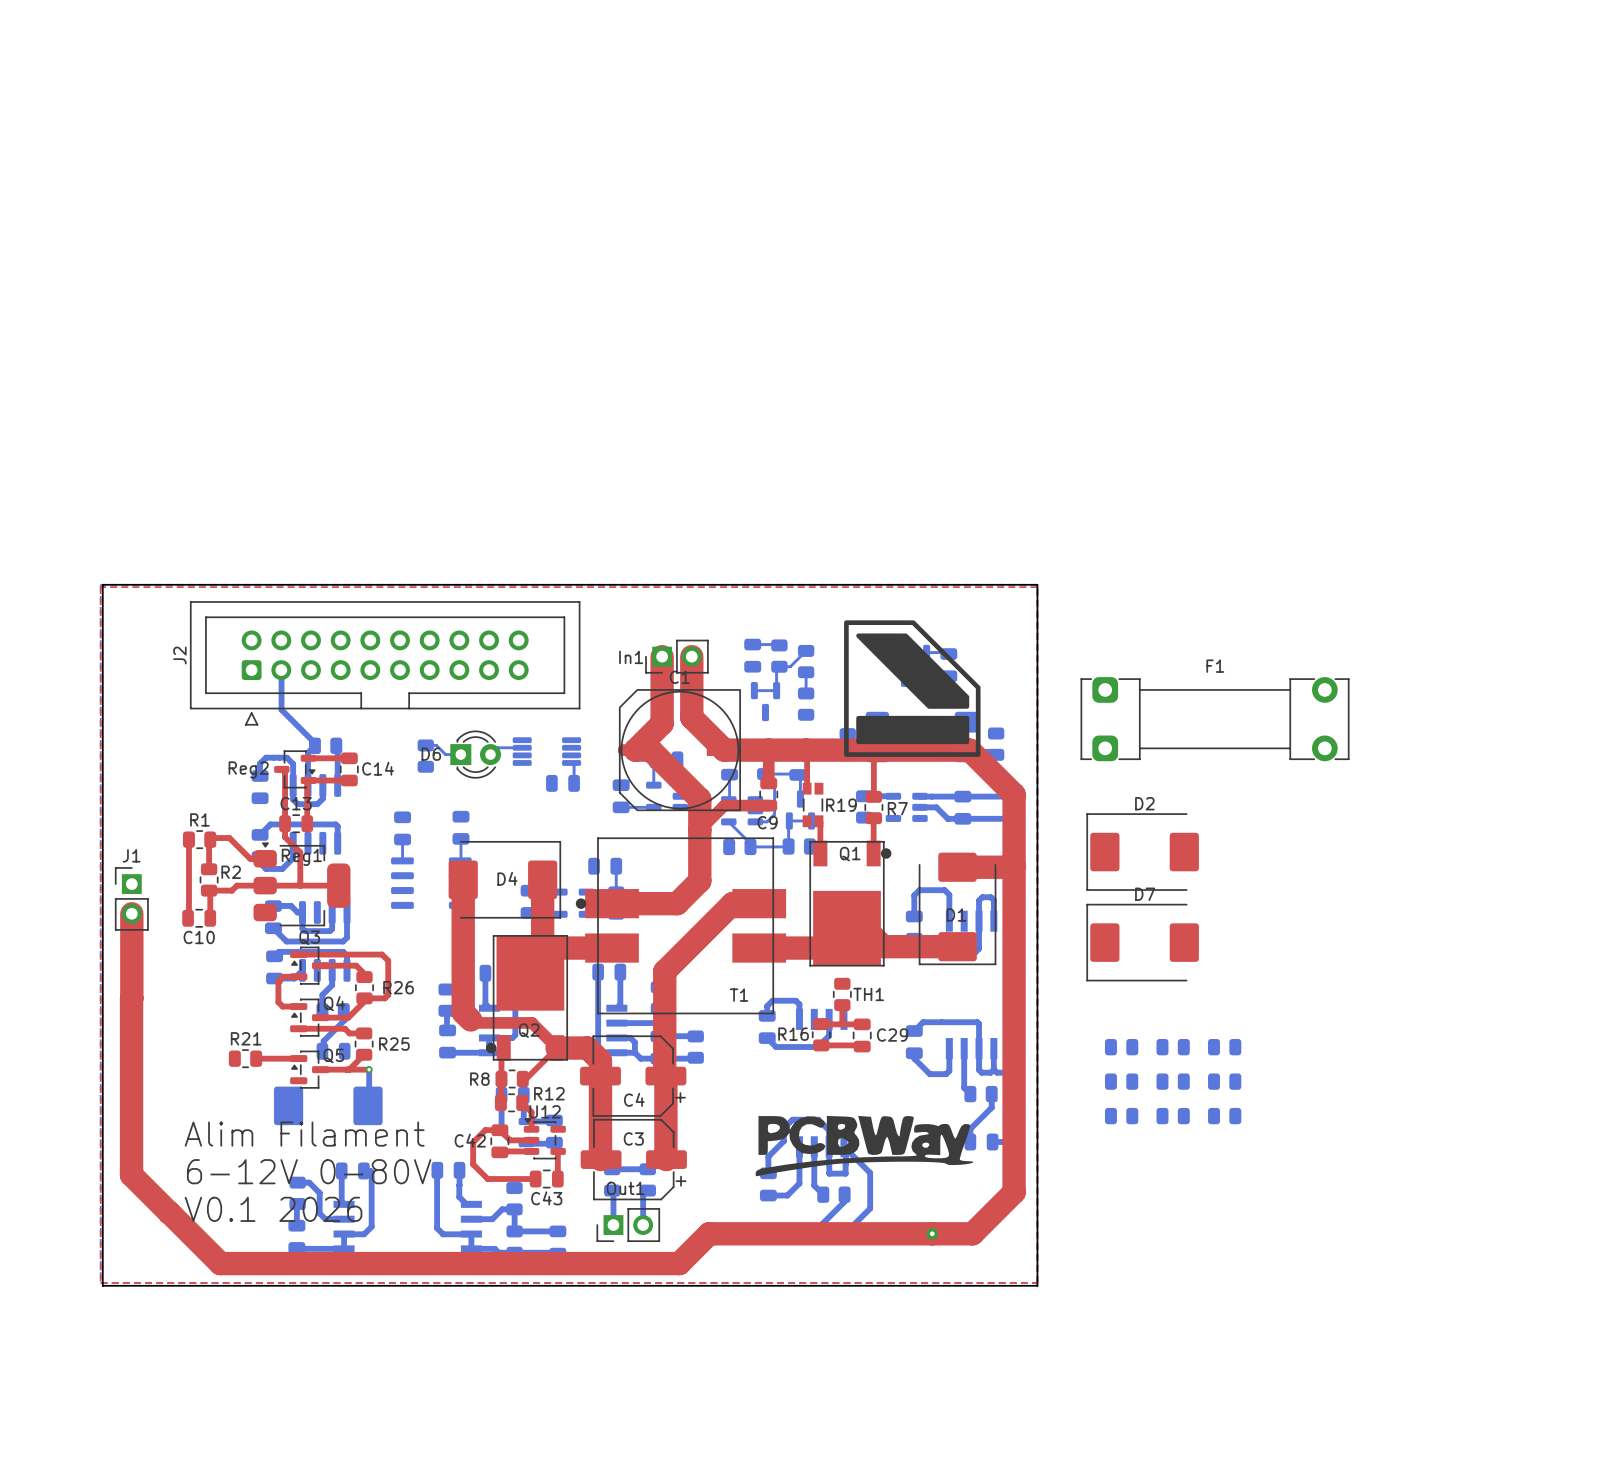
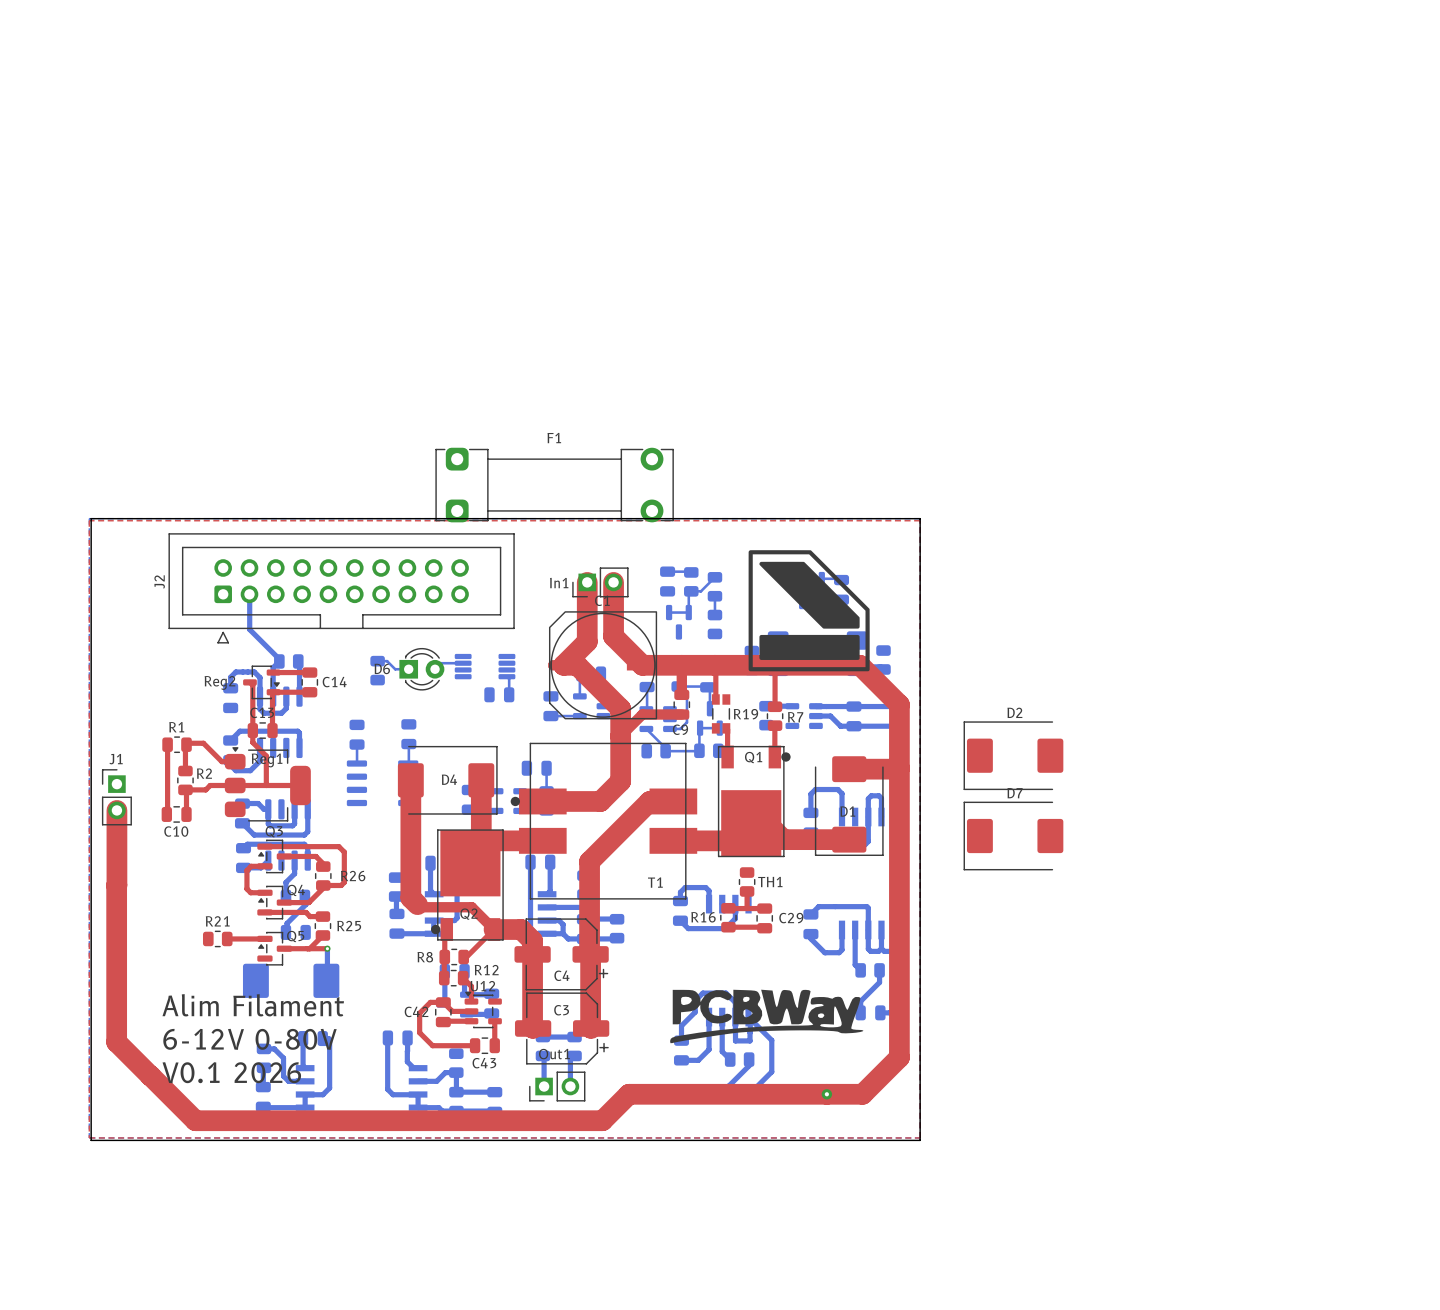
F1 position: (1215, 719) -> (554, 485)
part: (1121, 1047) -> none
part: (1173, 1047) -> none
part: (1224, 1047) -> none
part: (1121, 1081) -> none
part: (1173, 1081) -> none
part: (1224, 1081) -> none
part: (1121, 1116) -> none
part: (1173, 1116) -> none
part: (1224, 1116) -> none

